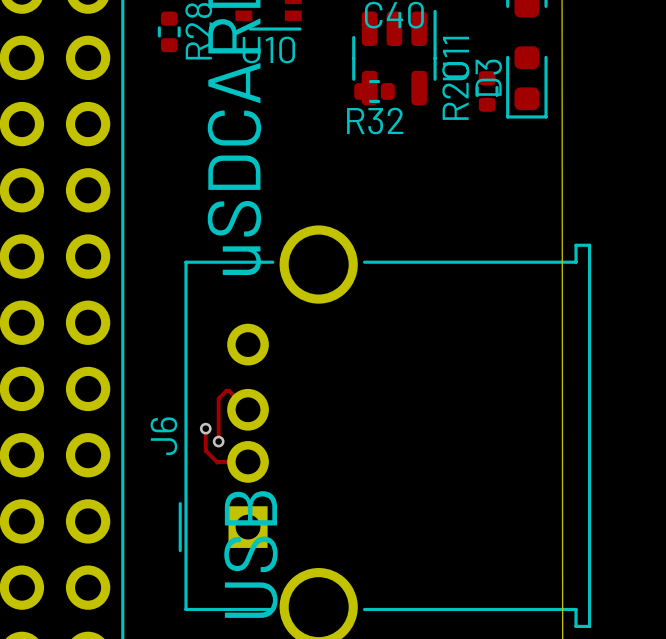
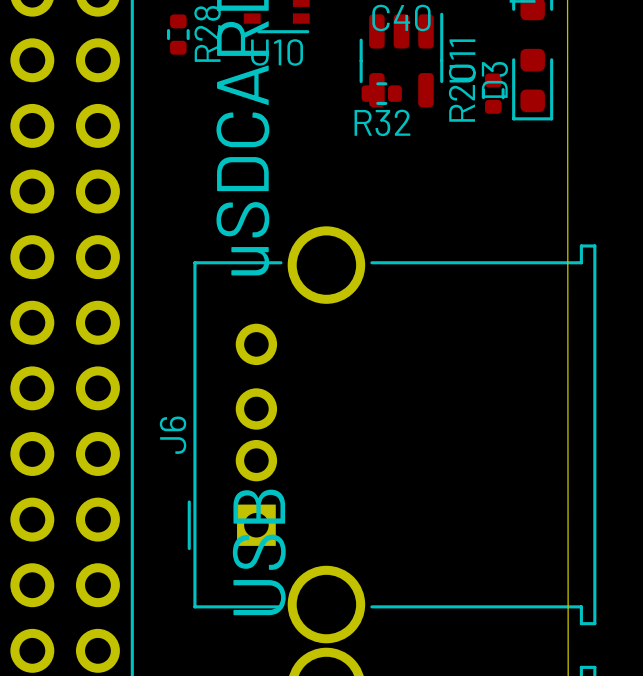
track: (248, 409) (229, 390) (226, 390) (218, 398) (218, 441) -> none
track: (205, 428) (205, 450) (217, 462) (248, 461) -> none
via: (205, 428) -> none
via: (218, 441) -> none

